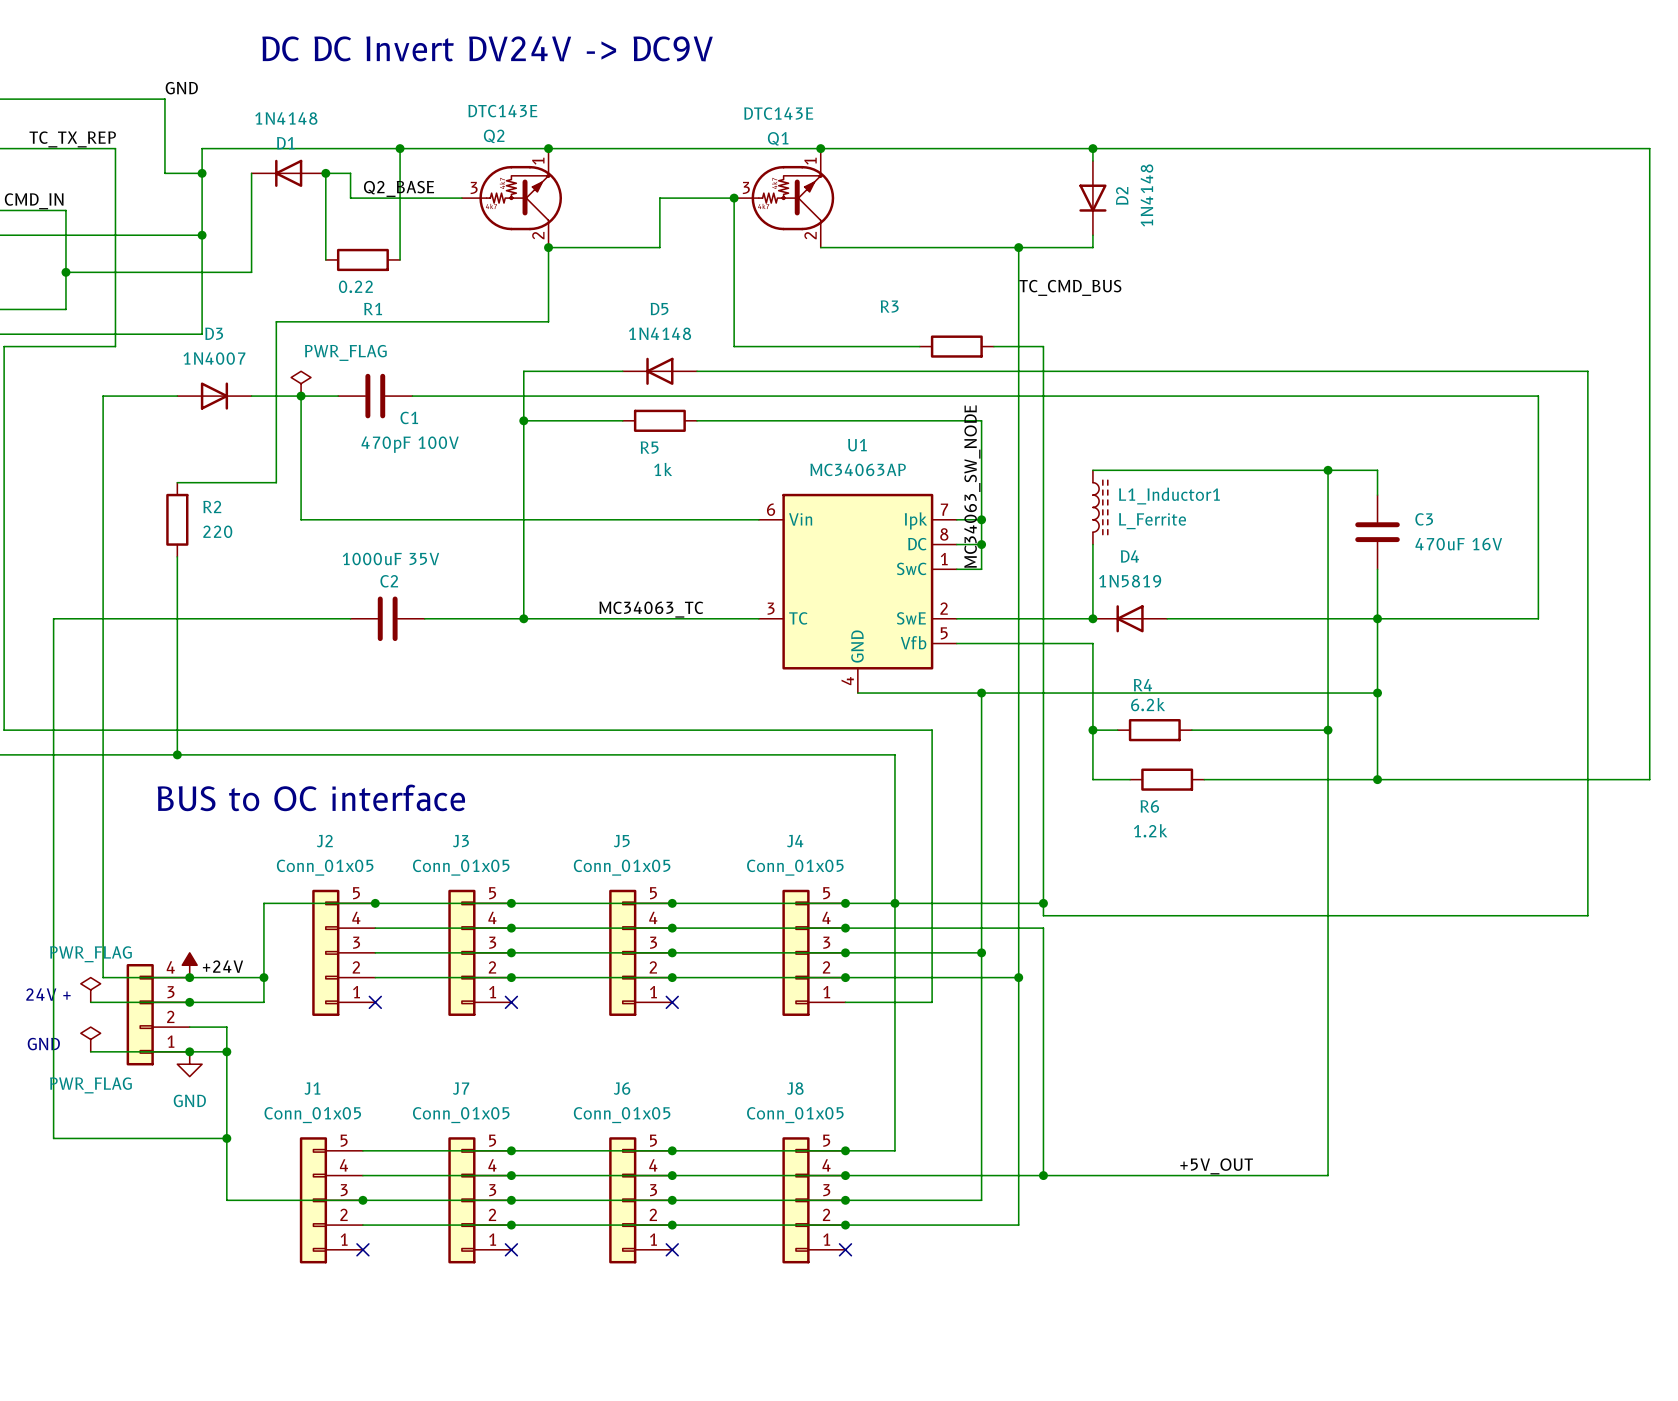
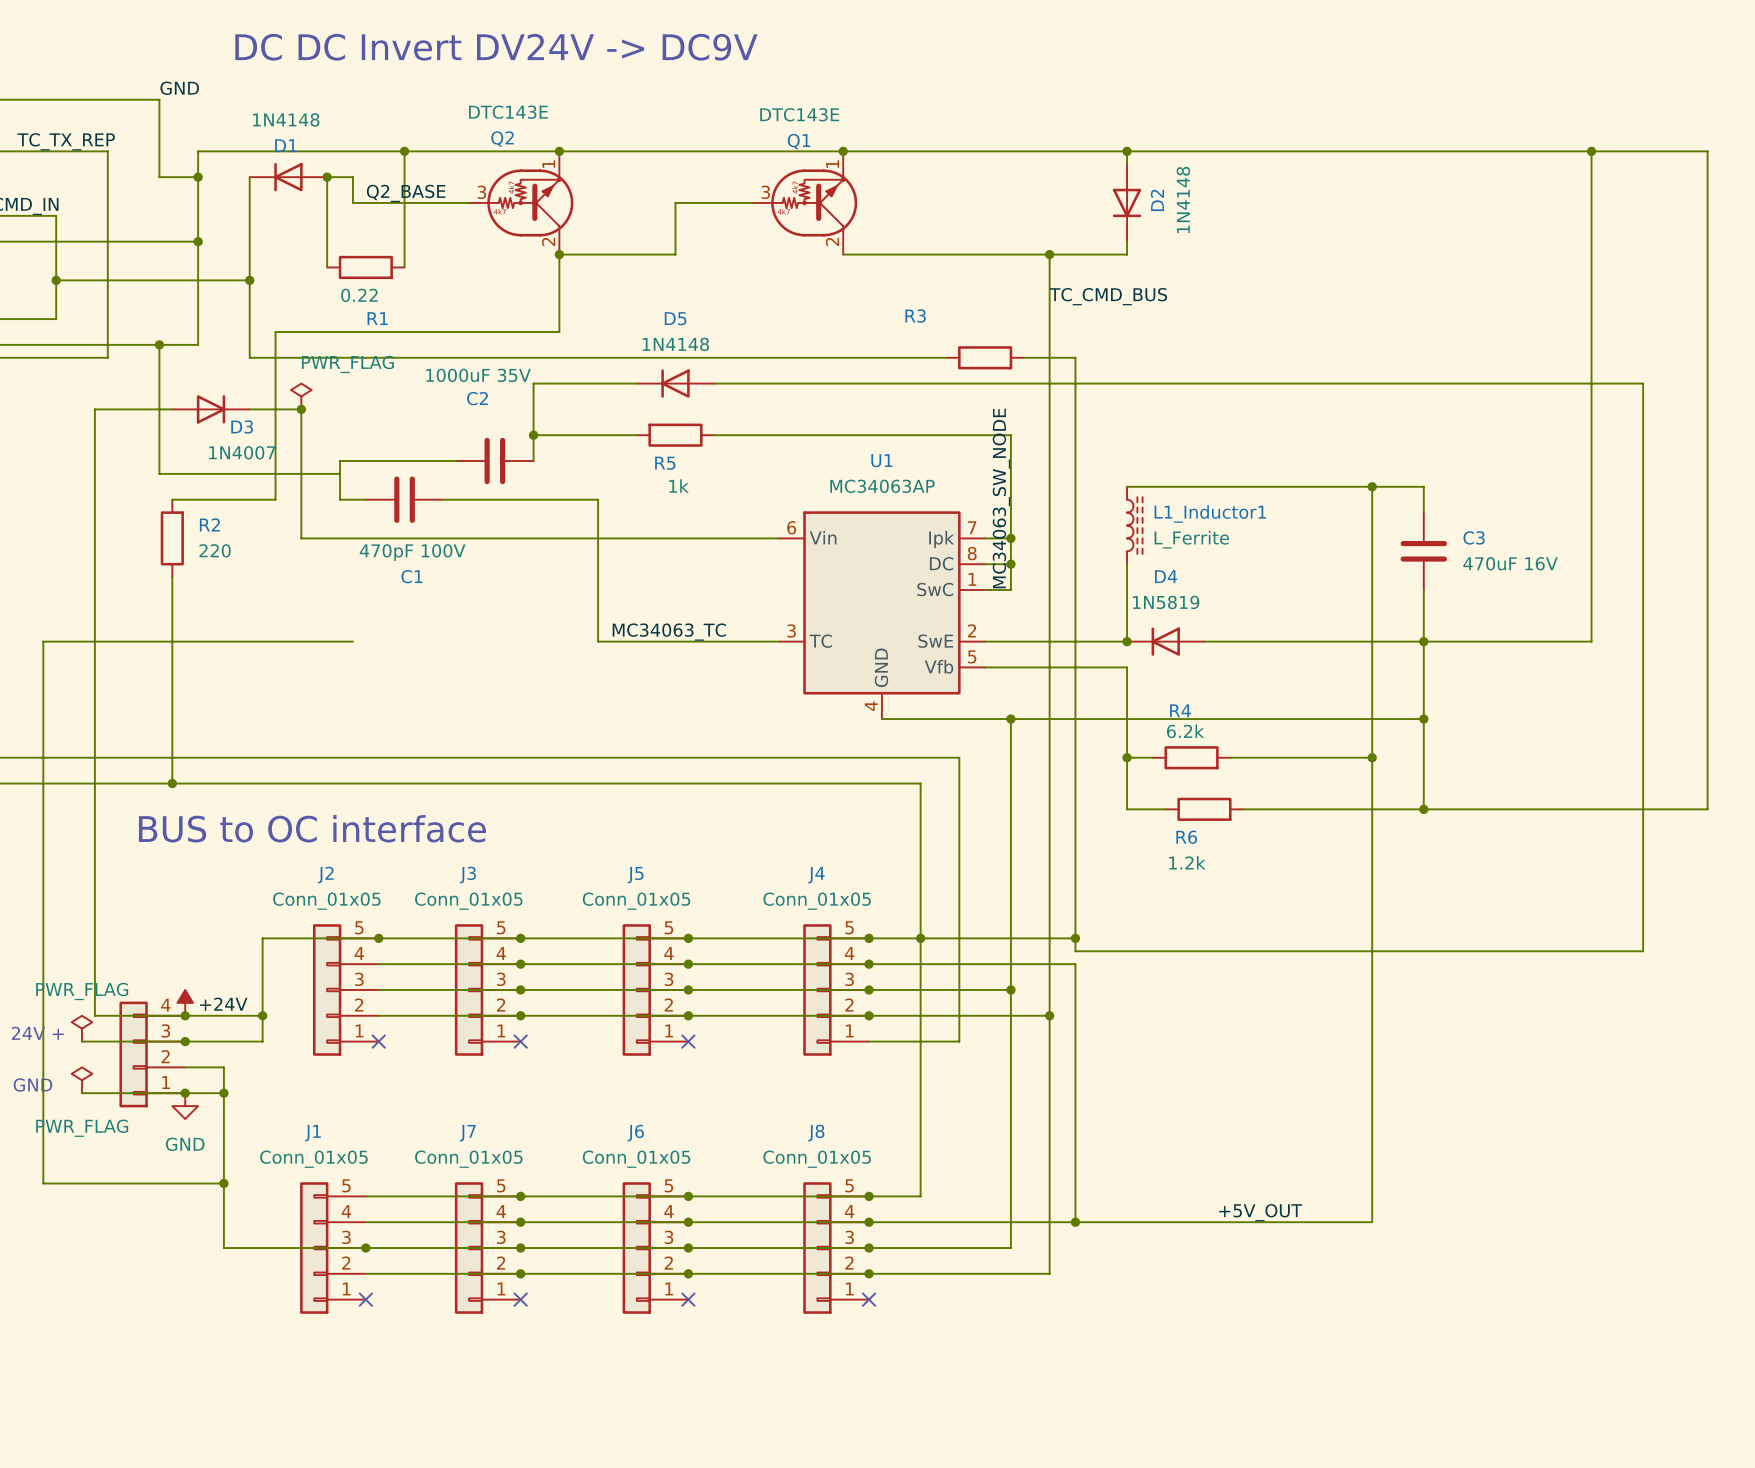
junction: none -> (1591, 151)
wire: (734, 198) (734, 346) -> (249, 280) (249, 357) (752, 357)
junction: (734, 198) -> none
junction: none -> (249, 280)
D3 name position: D3 (214, 333) -> D3 (242, 426)
wire: none -> (159, 344) (159, 473) (340, 473)
junction: none -> (159, 344)
D3 value position: 1N4007 (214, 358) -> 1N4007 (242, 452)
wire: (301, 396) (338, 396) -> none
C1 position: (375, 396) -> (404, 499)
wire: (412, 396) (1538, 396) -> (1591, 151) (1591, 409)
C1 name position: C1 (409, 417) -> C1 (411, 576)
C1 value position: 470pF 100V (410, 444) -> 470pF 100V (412, 552)
wire: none -> (456, 461) (340, 461) (340, 499) (365, 499)
wire: (523, 445) (523, 618) -> none
C2 value position: 1000uF 35V (390, 559) -> 1000uF 35V (478, 375)
C2 name position: C2 (389, 581) -> C2 (477, 398)
C2 position: (387, 618) -> (494, 461)
wire: (424, 618) (585, 618) -> (443, 499) (598, 499) (598, 641)
junction: (523, 618) -> none

